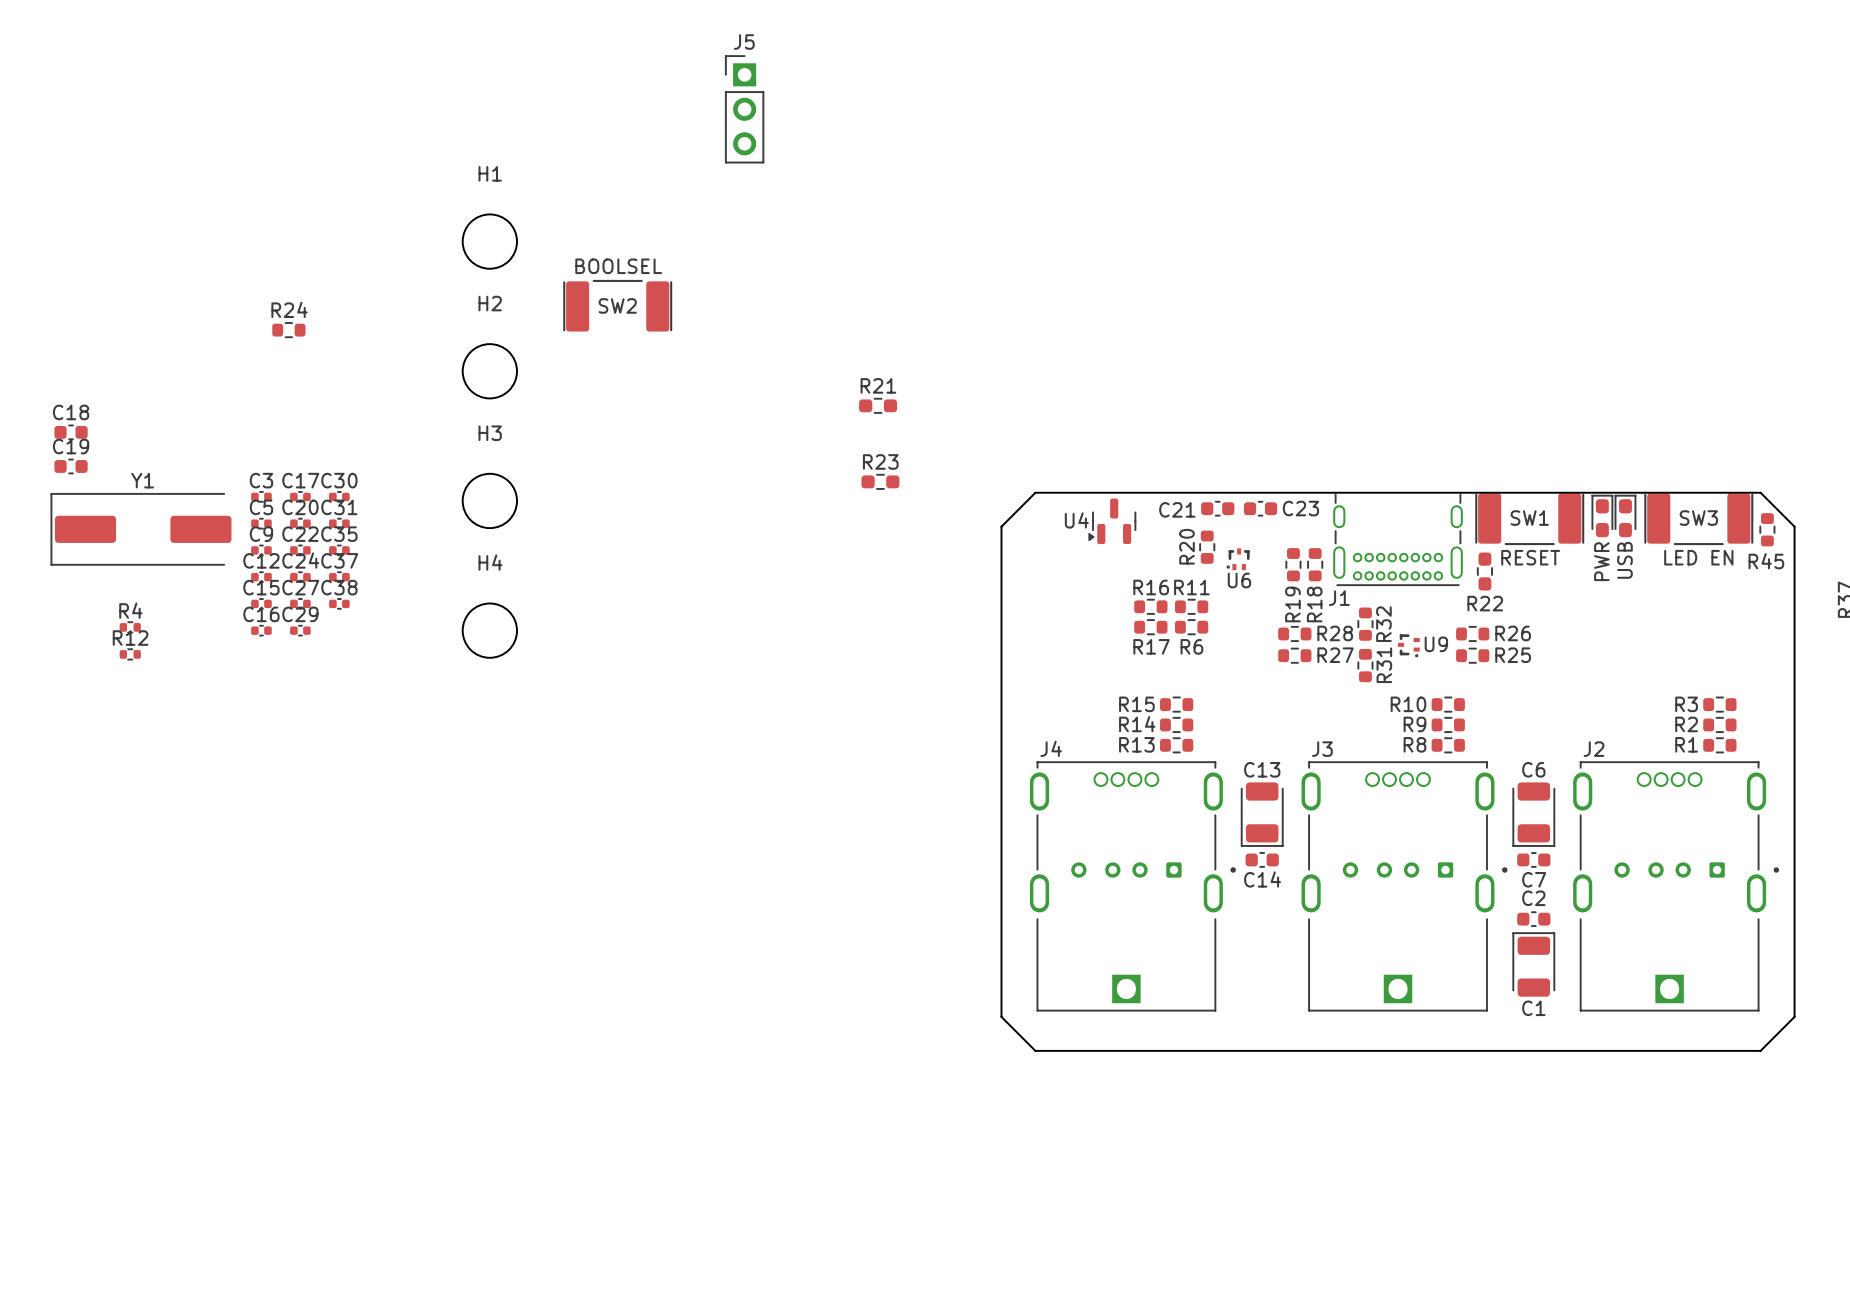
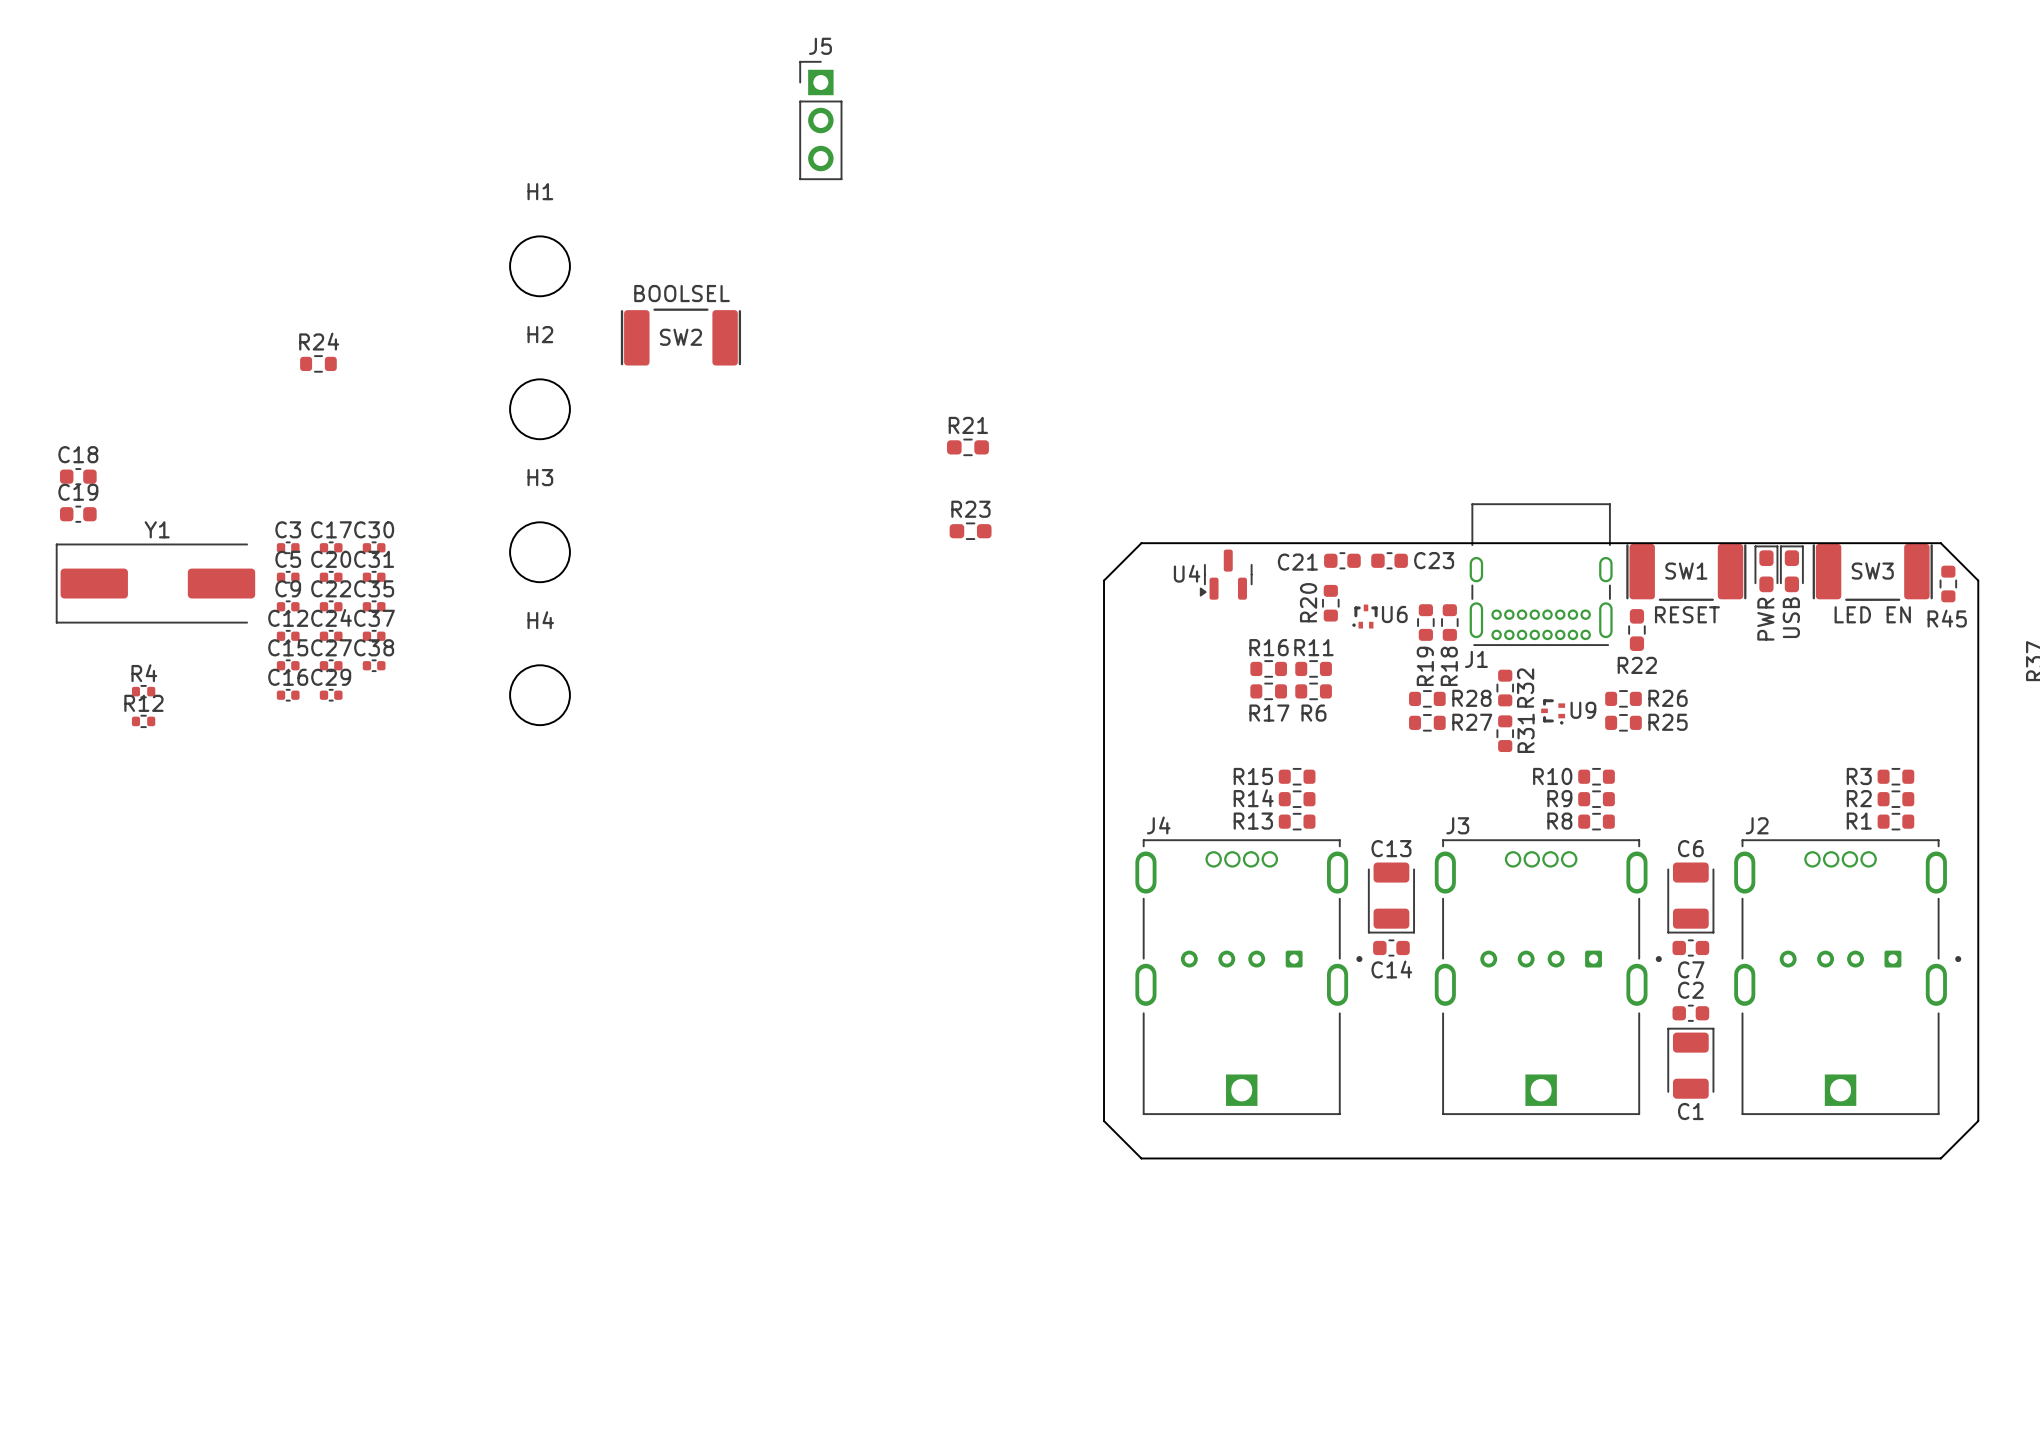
J1 footprint: [1333, 493, 1463, 586] -> [1469, 503, 1613, 646]
U6 name position: U6 (1239, 580) -> U6 (1394, 614)

